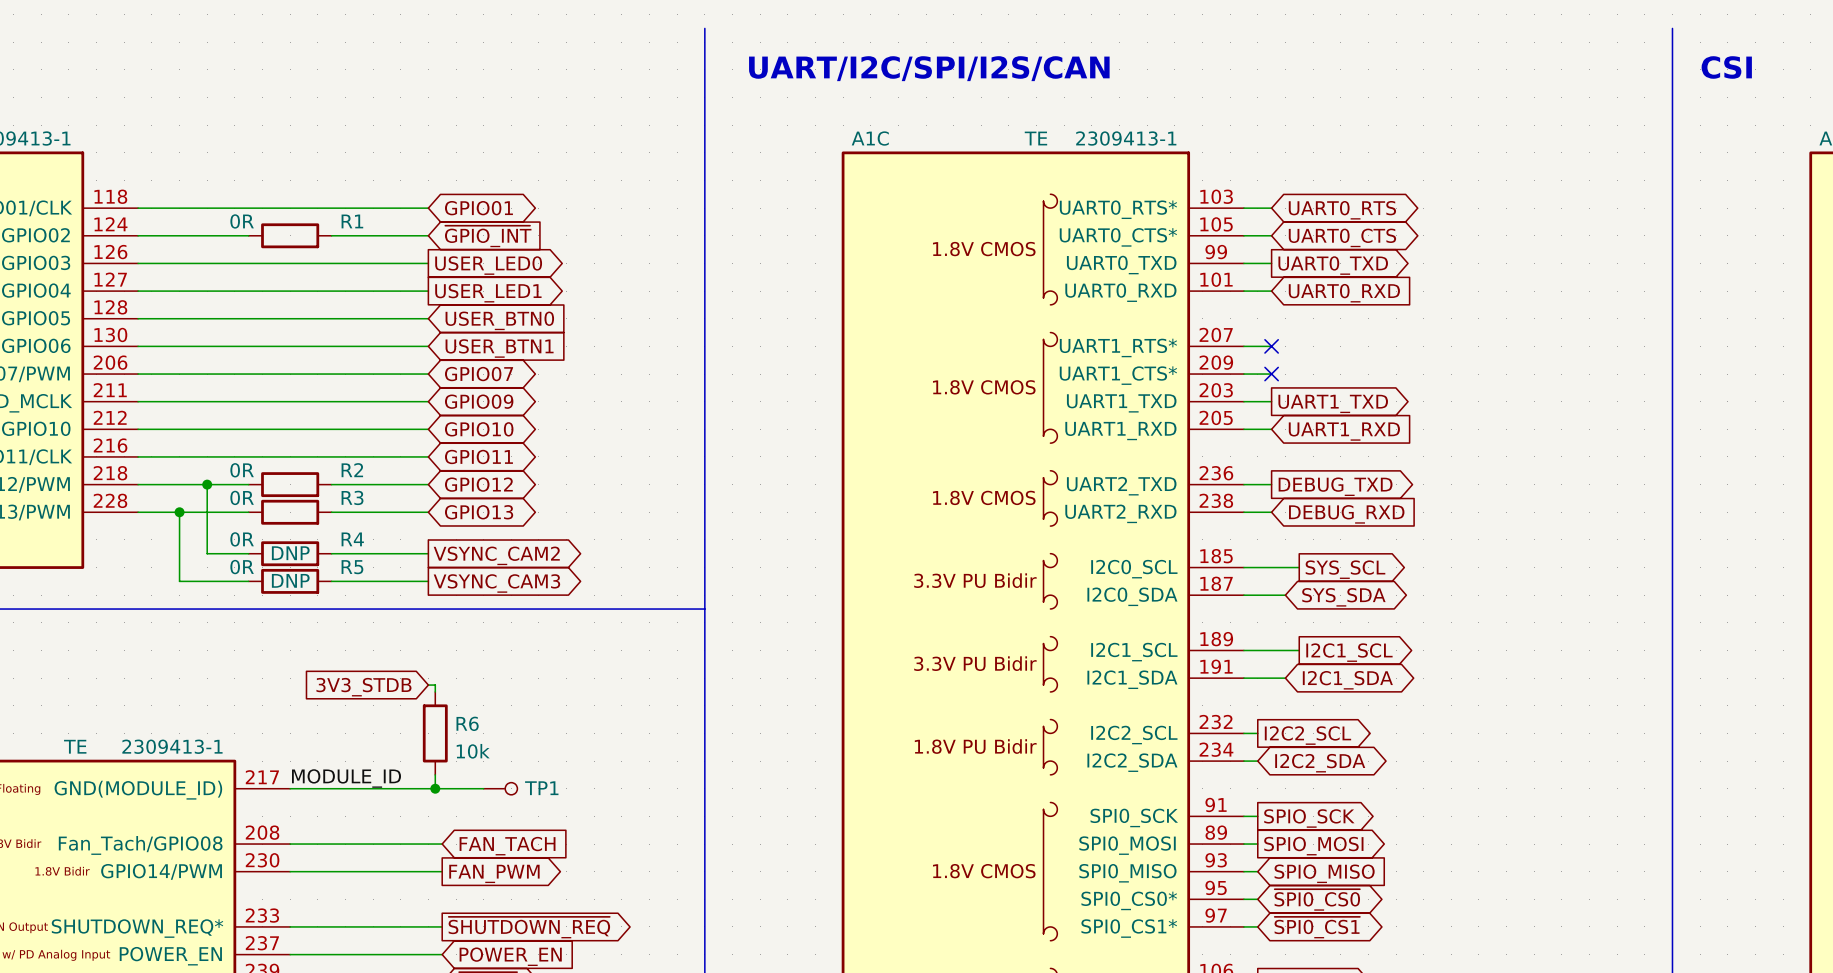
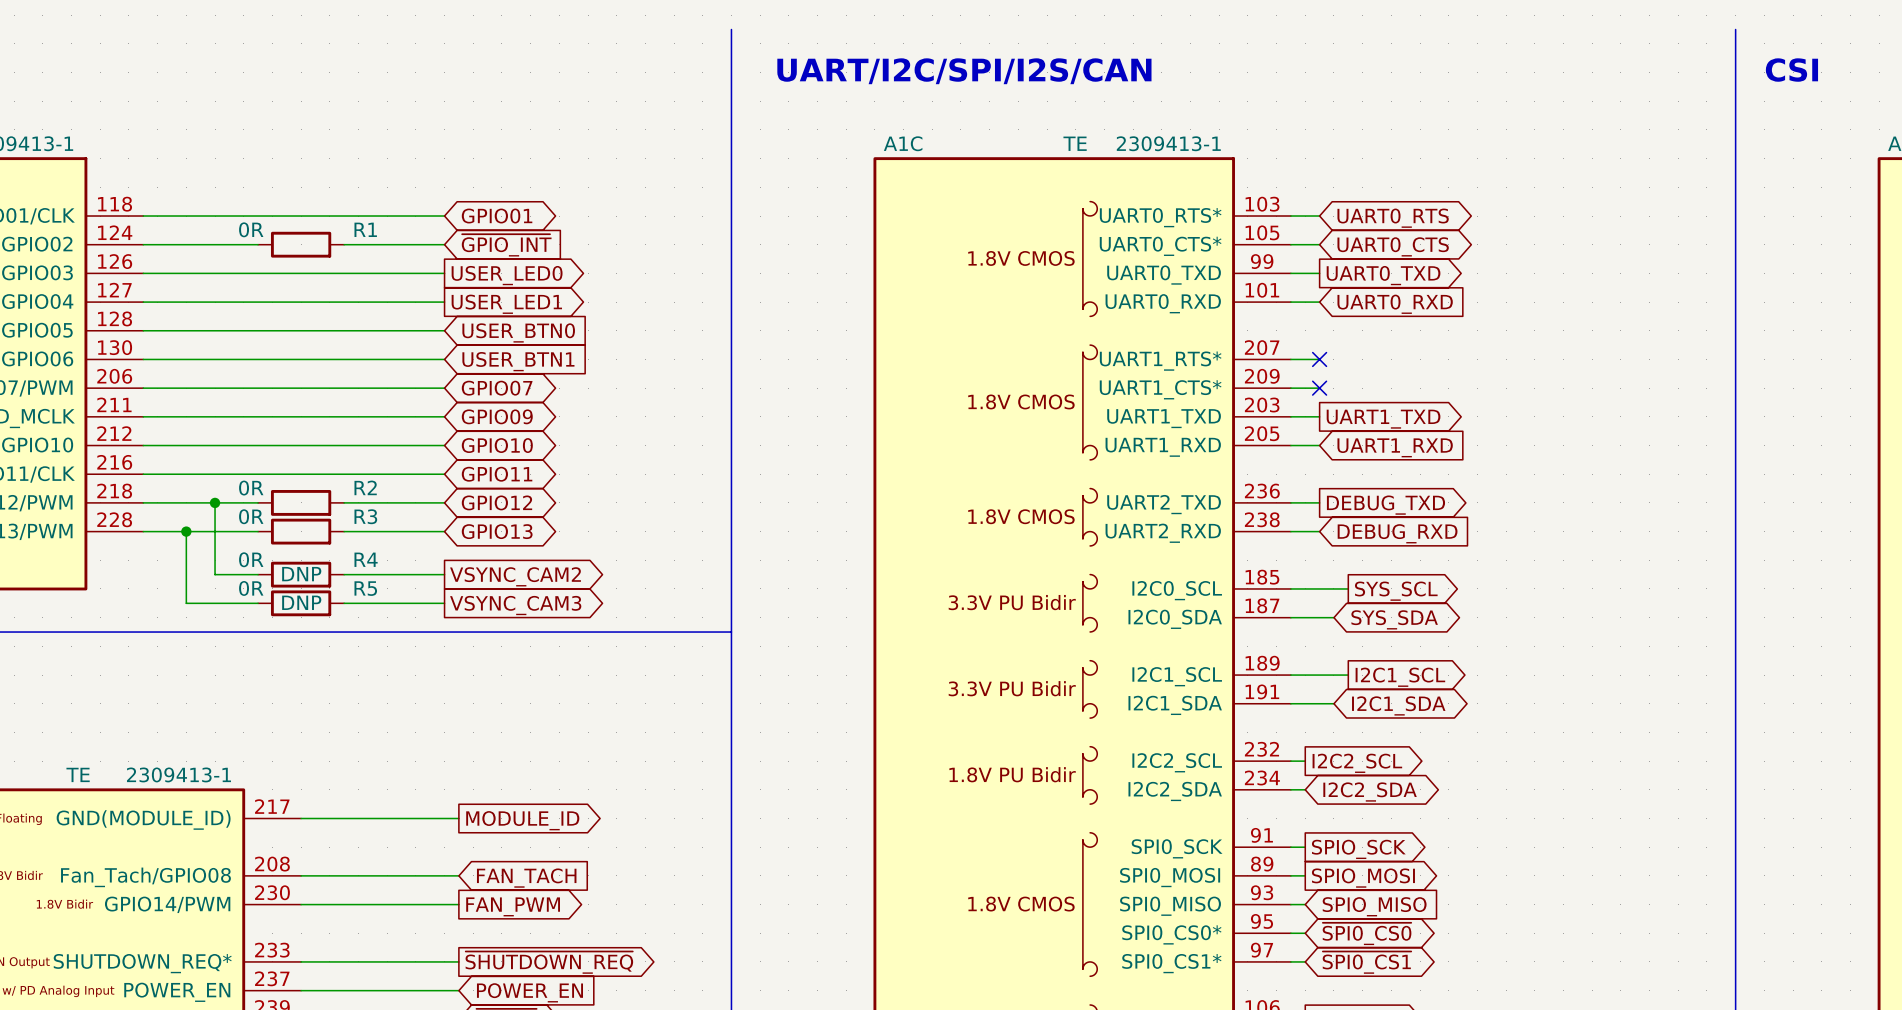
wire: (428, 685) (435, 685) (435, 691) -> none
global label: 3V3_STDB (363, 687) -> none
R6: (435, 733) -> none
wire: (435, 774) (435, 788) -> none
label: MODULE_ID (346, 778) -> none
junction: (435, 788) -> none
wire: (442, 788) (483, 788) -> none
TP1: (500, 788) -> none
global label: none -> MODULE_ID (522, 820)

